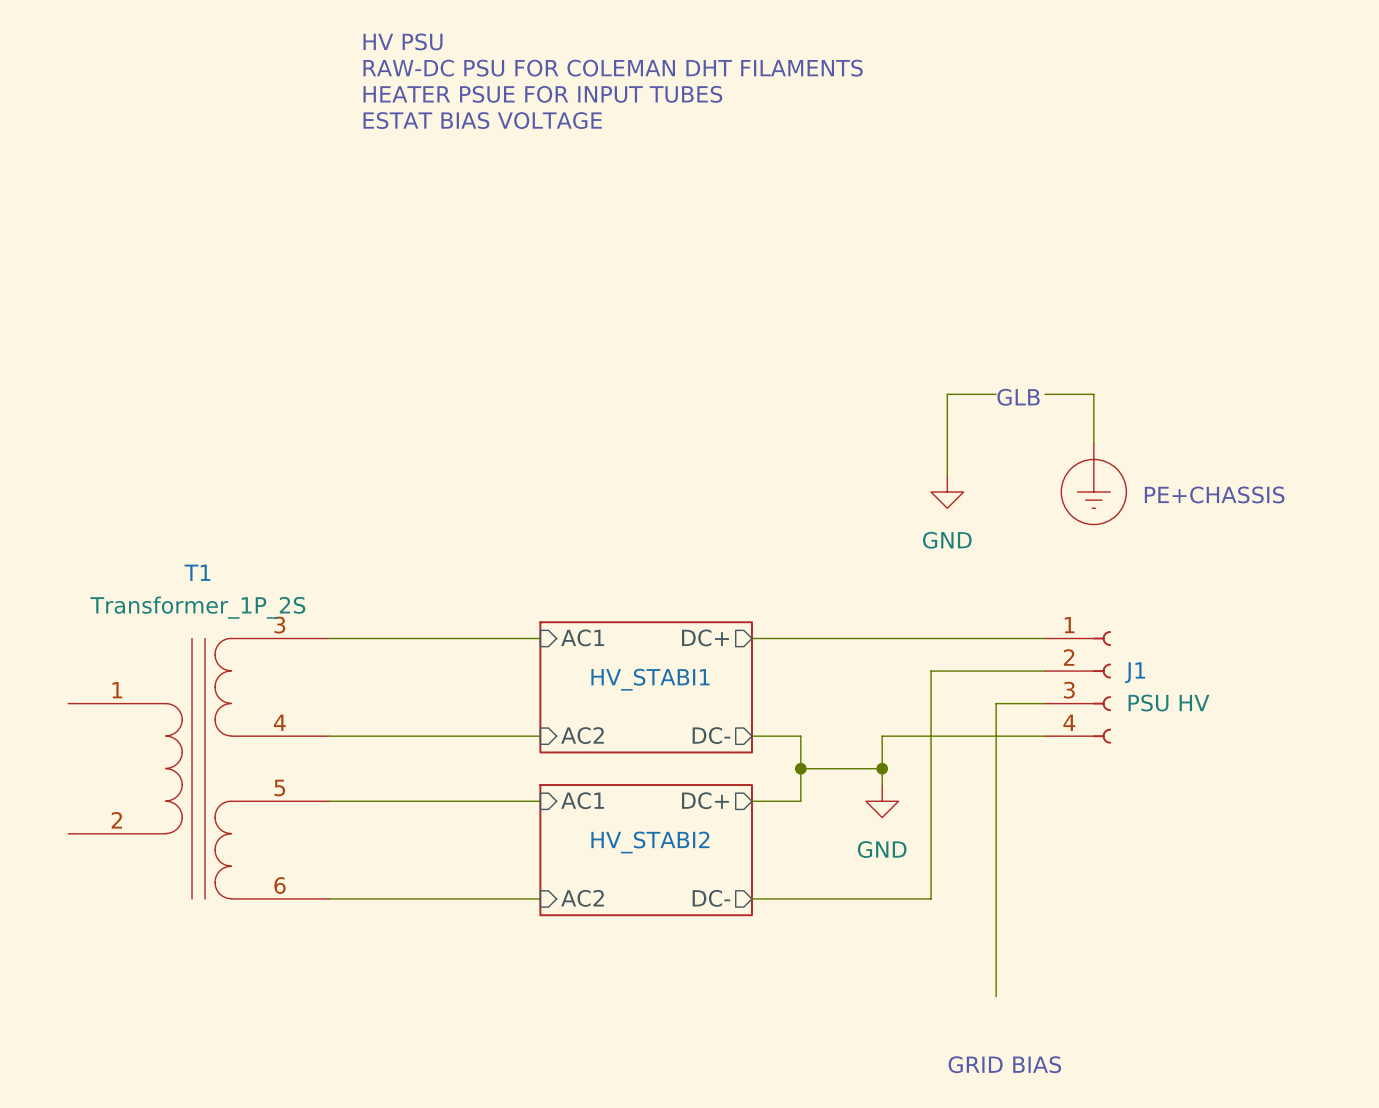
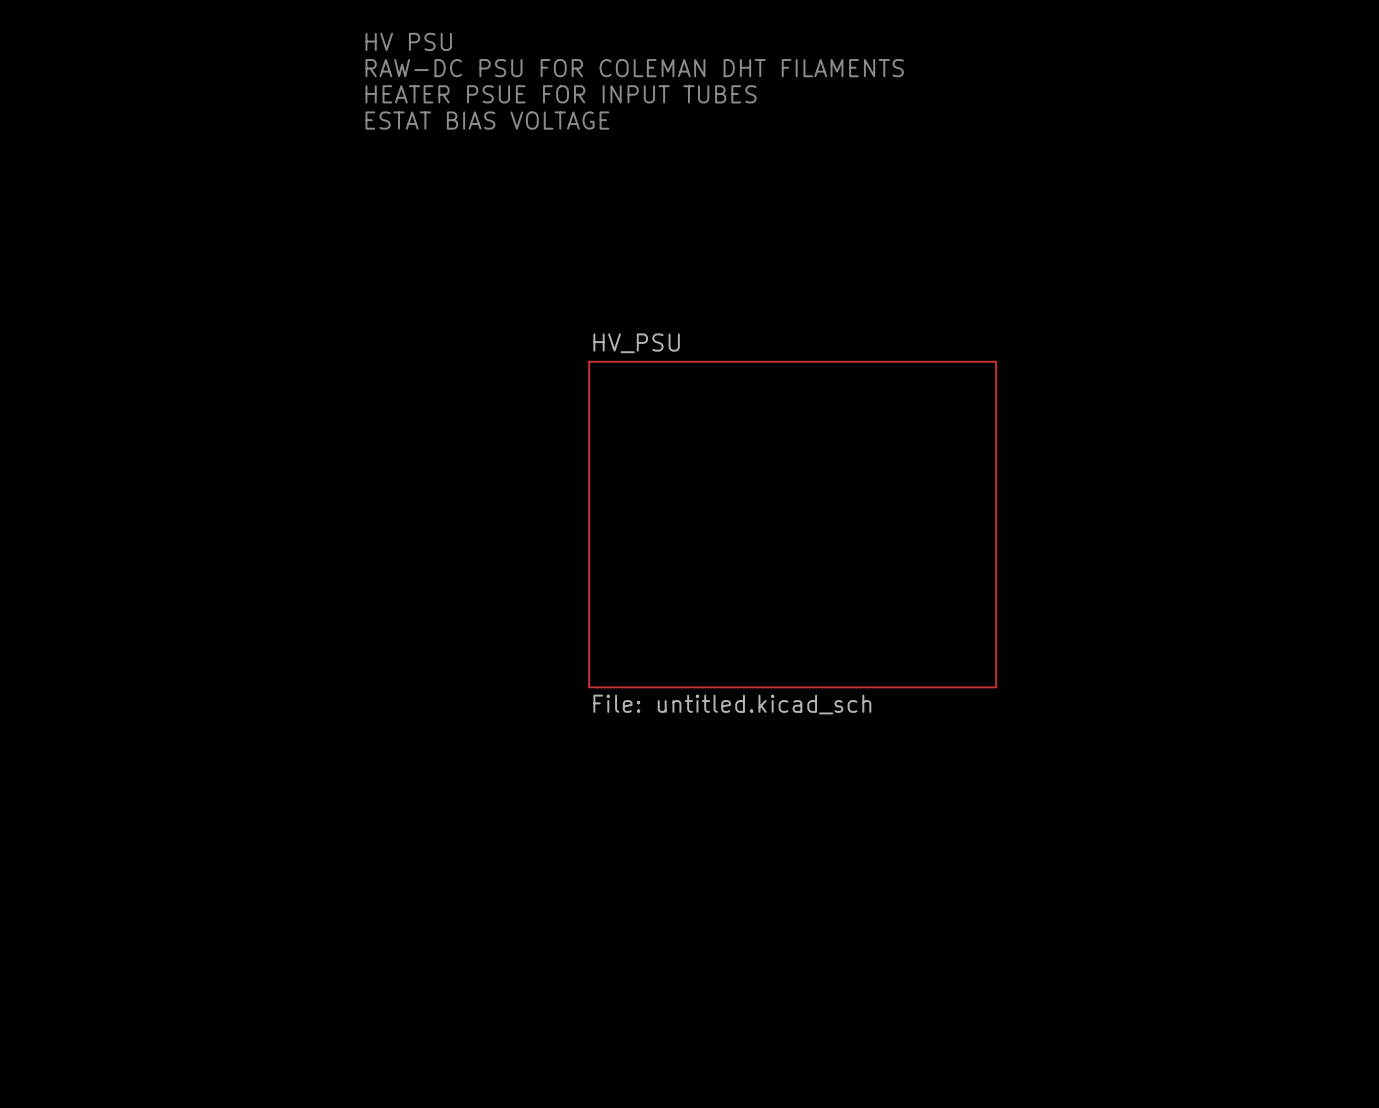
wire: (996, 394) (947, 394) (947, 475) -> none
wire: (1044, 394) (1093, 394) (1093, 443) -> none
text: GLB (1018, 397) -> none
power symbol: (1093, 483) -> none
power symbol: GND (947, 492) -> none
text: PE+CHASSIS (1214, 494) -> none
sheet HV_PSU: none -> File: untitled.kicad_sch (792, 524)
sheet pin: AC1 (582, 637) -> none
sheet pin: DC+ (705, 637) -> none
wire: (328, 638) (540, 638) -> none
wire: (751, 638) (1044, 638) -> none
wire: (1044, 671) (931, 671) (931, 898) (751, 898) -> none
sheet HV_STABI1: (646, 687) -> none
J1: PSU HV (1078, 687) -> none
wire: (1044, 703) (996, 703) (996, 996) -> none
sheet pin: AC2 (582, 735) -> none
sheet pin: DC- (711, 735) -> none
wire: (328, 736) (540, 736) -> none
wire: (751, 736) (800, 736) (800, 801) (751, 801) -> none
wire: (1044, 736) (882, 736) (882, 785) -> none
T1: Transformer_1P_2S (198, 768) -> none
wire: (800, 768) (882, 768) -> none
junction: (800, 768) -> none
junction: (882, 768) -> none
sheet pin: AC1 (582, 800) -> none
sheet pin: DC+ (705, 800) -> none
wire: (328, 801) (540, 801) -> none
power symbol: GND (882, 801) -> none
sheet HV_STABI2: (646, 850) -> none
wire: (328, 898) (540, 898) -> none
sheet pin: AC2 (582, 898) -> none
sheet pin: DC- (711, 898) -> none
text: GRID BIAS (1004, 1064) -> none

